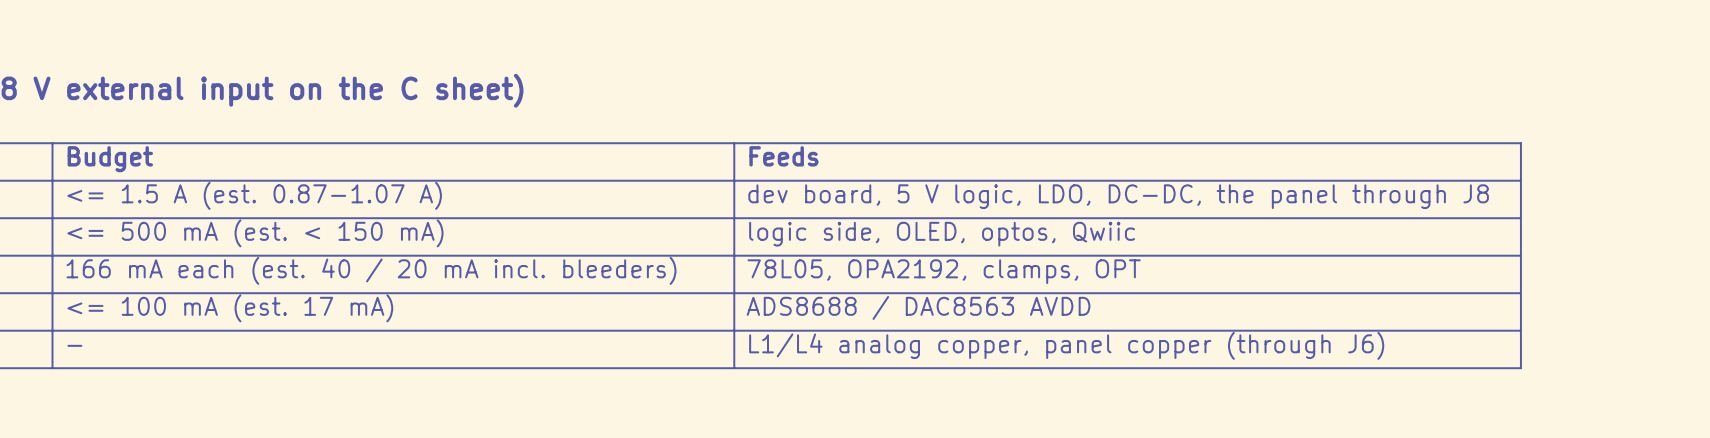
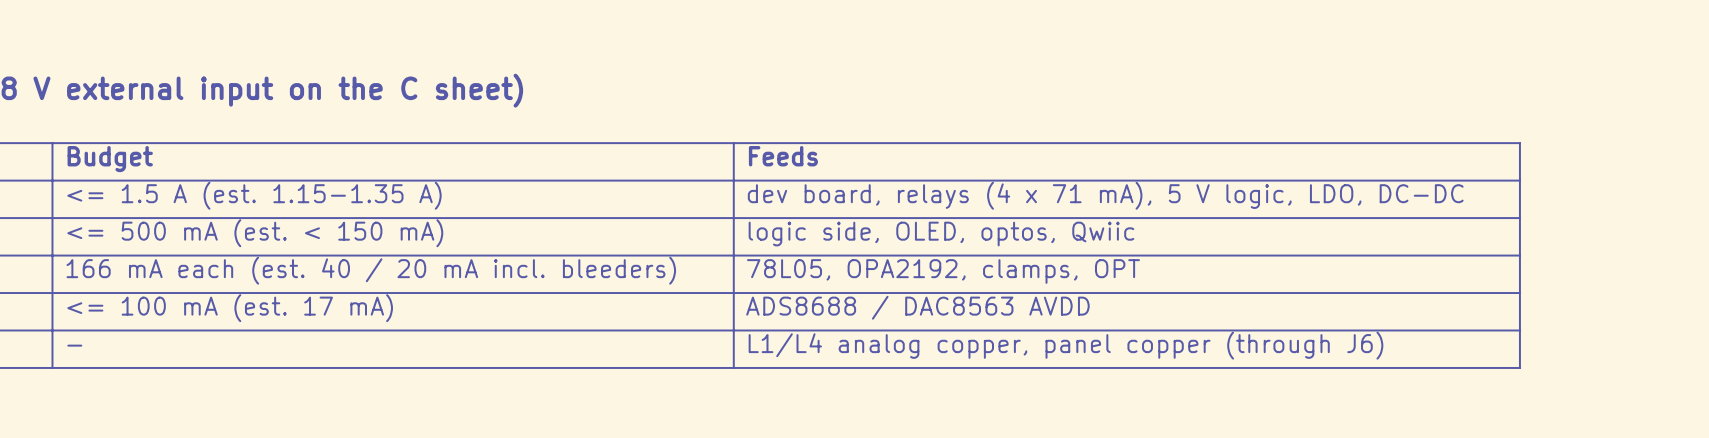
text: <= 1.5 A (est. 0.87-1.07 A) (254, 195) -> <= 1.5 A (est. 1.15-1.35 A) (254, 195)
text: dev board, 5 V logic, LDO, DC-DC, the panel through J8 (1118, 196) -> dev board, relays (4 x 71 mA), 5 V logic, LDO, DC-DC (1105, 195)

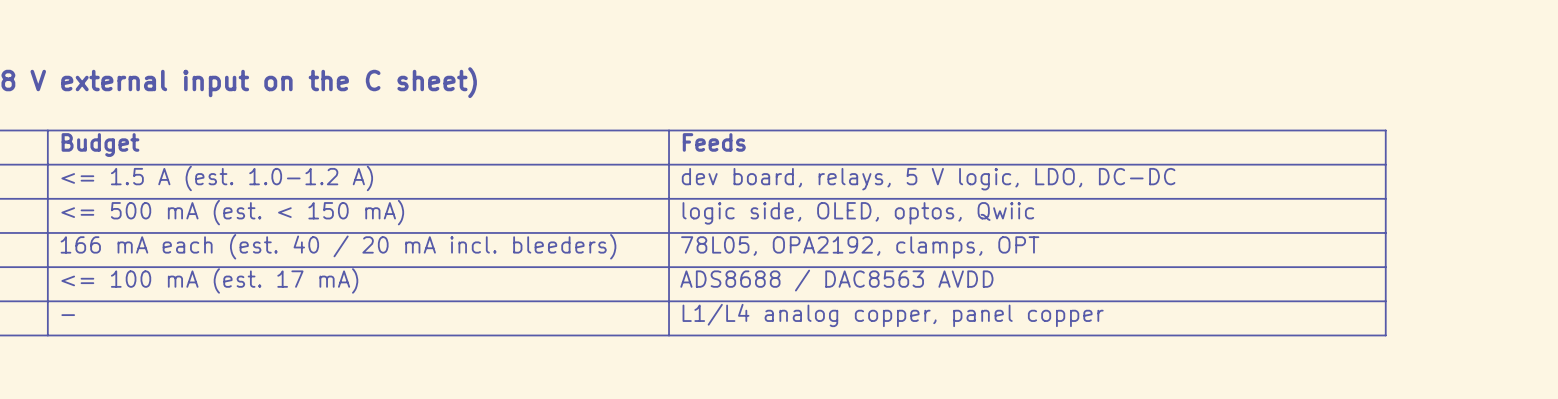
text: <= 1.5 A (est. 1.15-1.35 A) (254, 195) -> <= 1.5 A (est. 1.0-1.2 A) (217, 178)
text: dev board, relays (4 x 71 mA), 5 V logic, LDO, DC-DC (1105, 195) -> dev board, relays, 5 V logic, LDO, DC-DC (928, 179)
text: L1/L4 analog copper, panel copper (through J6) (1065, 345) -> L1/L4 analog copper, panel copper (893, 315)

